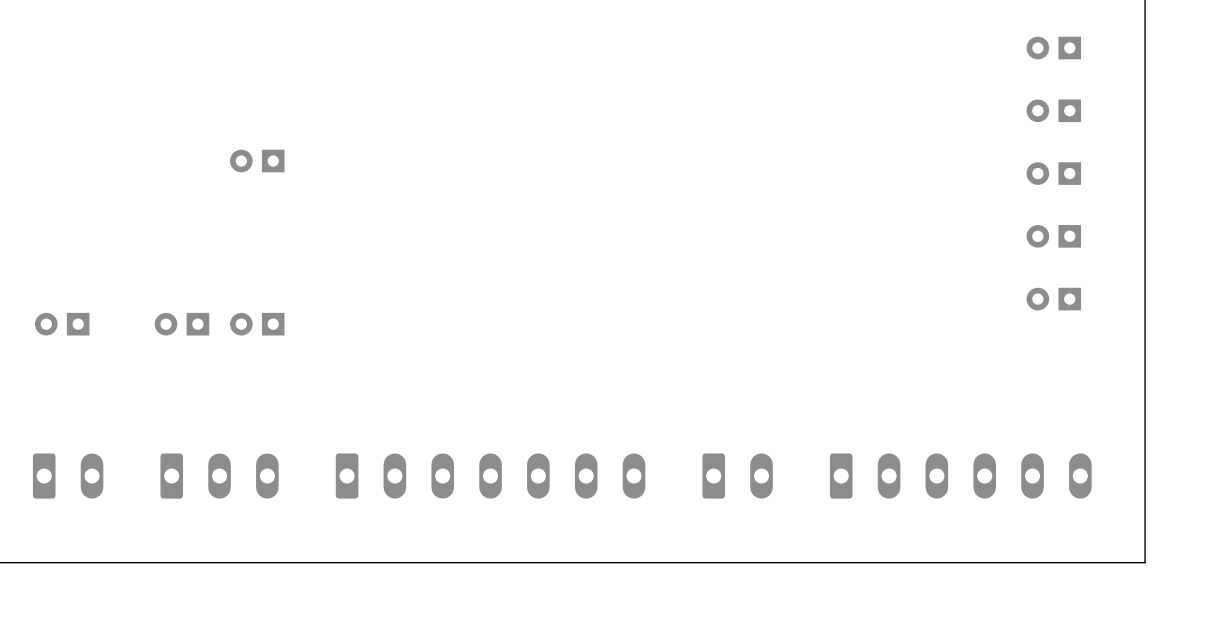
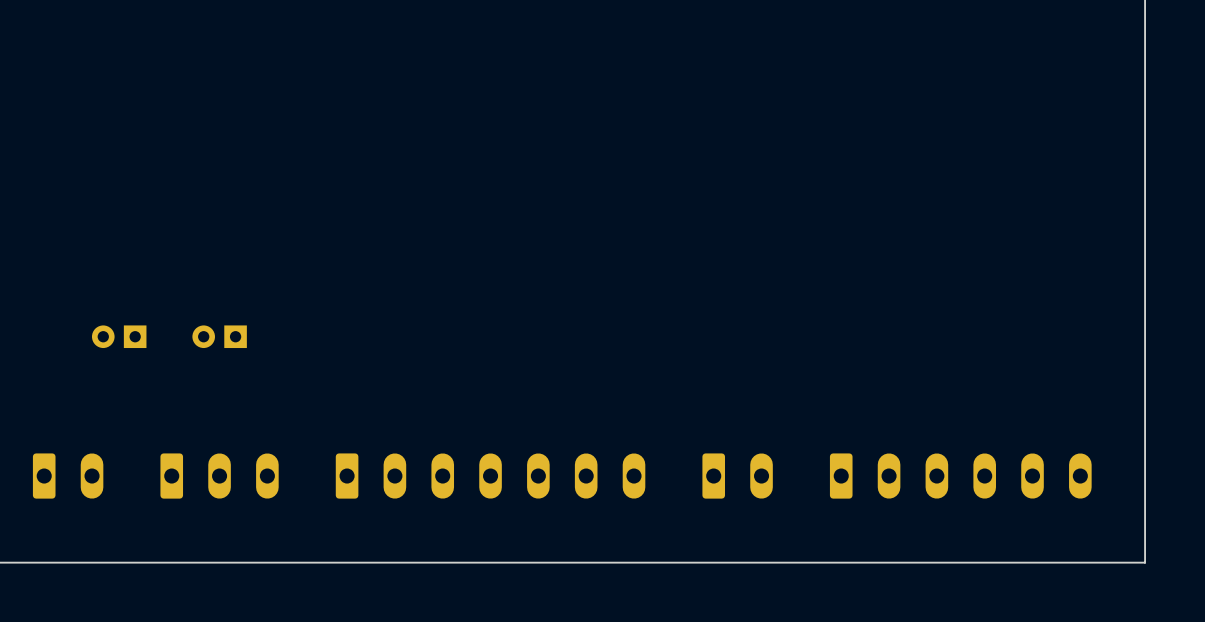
part: (1053, 48) -> none
part: (1053, 110) -> none
part: (257, 161) -> none
part: (1053, 173) -> none
part: (1053, 236) -> none
part: (1053, 299) -> none
part: (62, 324) -> none
part: (181, 324) -> none
part: (257, 324) -> none
part: none -> (119, 336)
part: none -> (219, 336)

